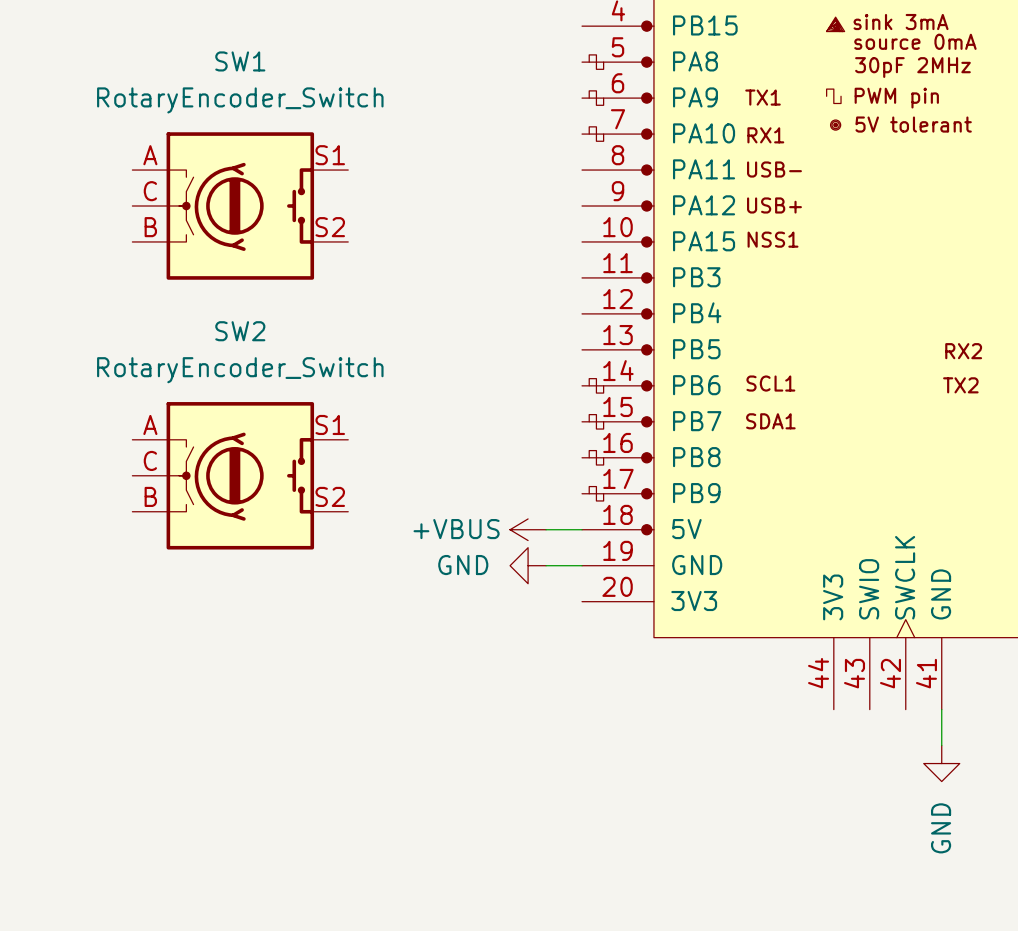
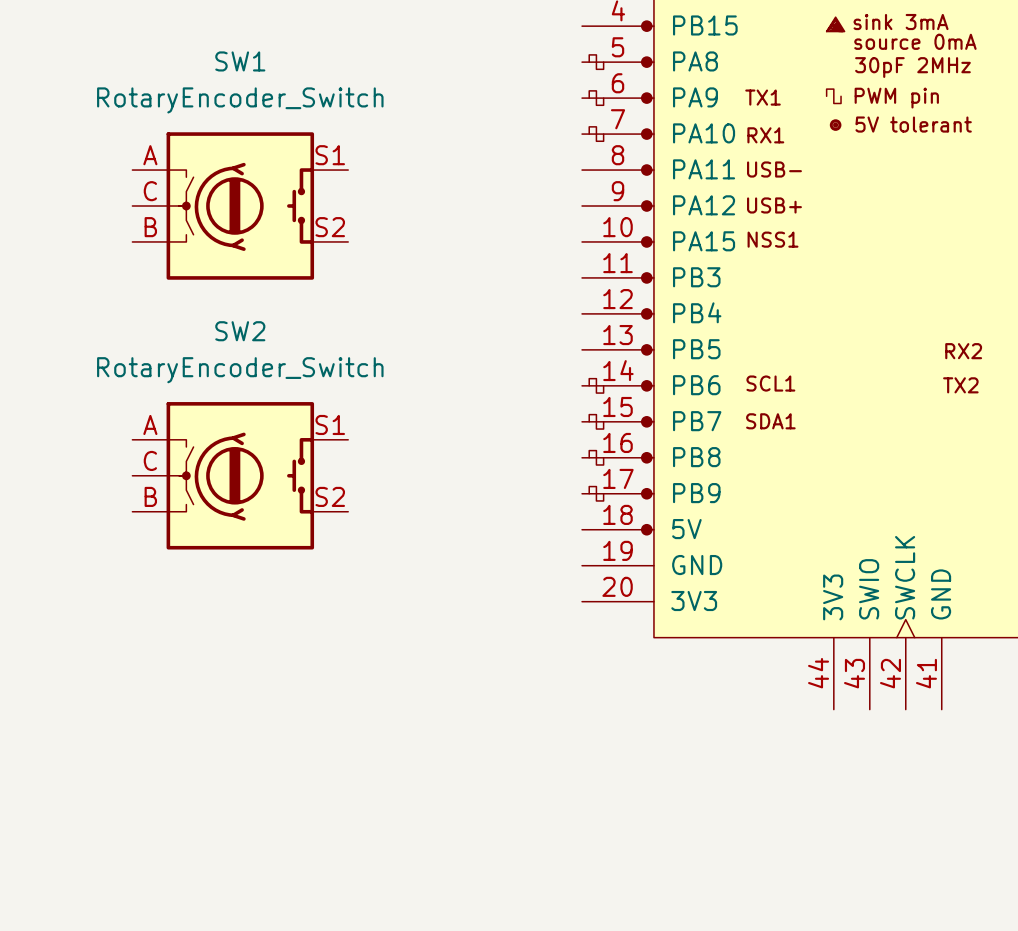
power symbol: +VBUS (528, 529) -> none
wire: (546, 529) (582, 529) -> none
power symbol: GND (528, 565) -> none
wire: (546, 565) (582, 565) -> none
wire: (941, 709) (941, 745) -> none
power symbol: GND (941, 763) -> none

